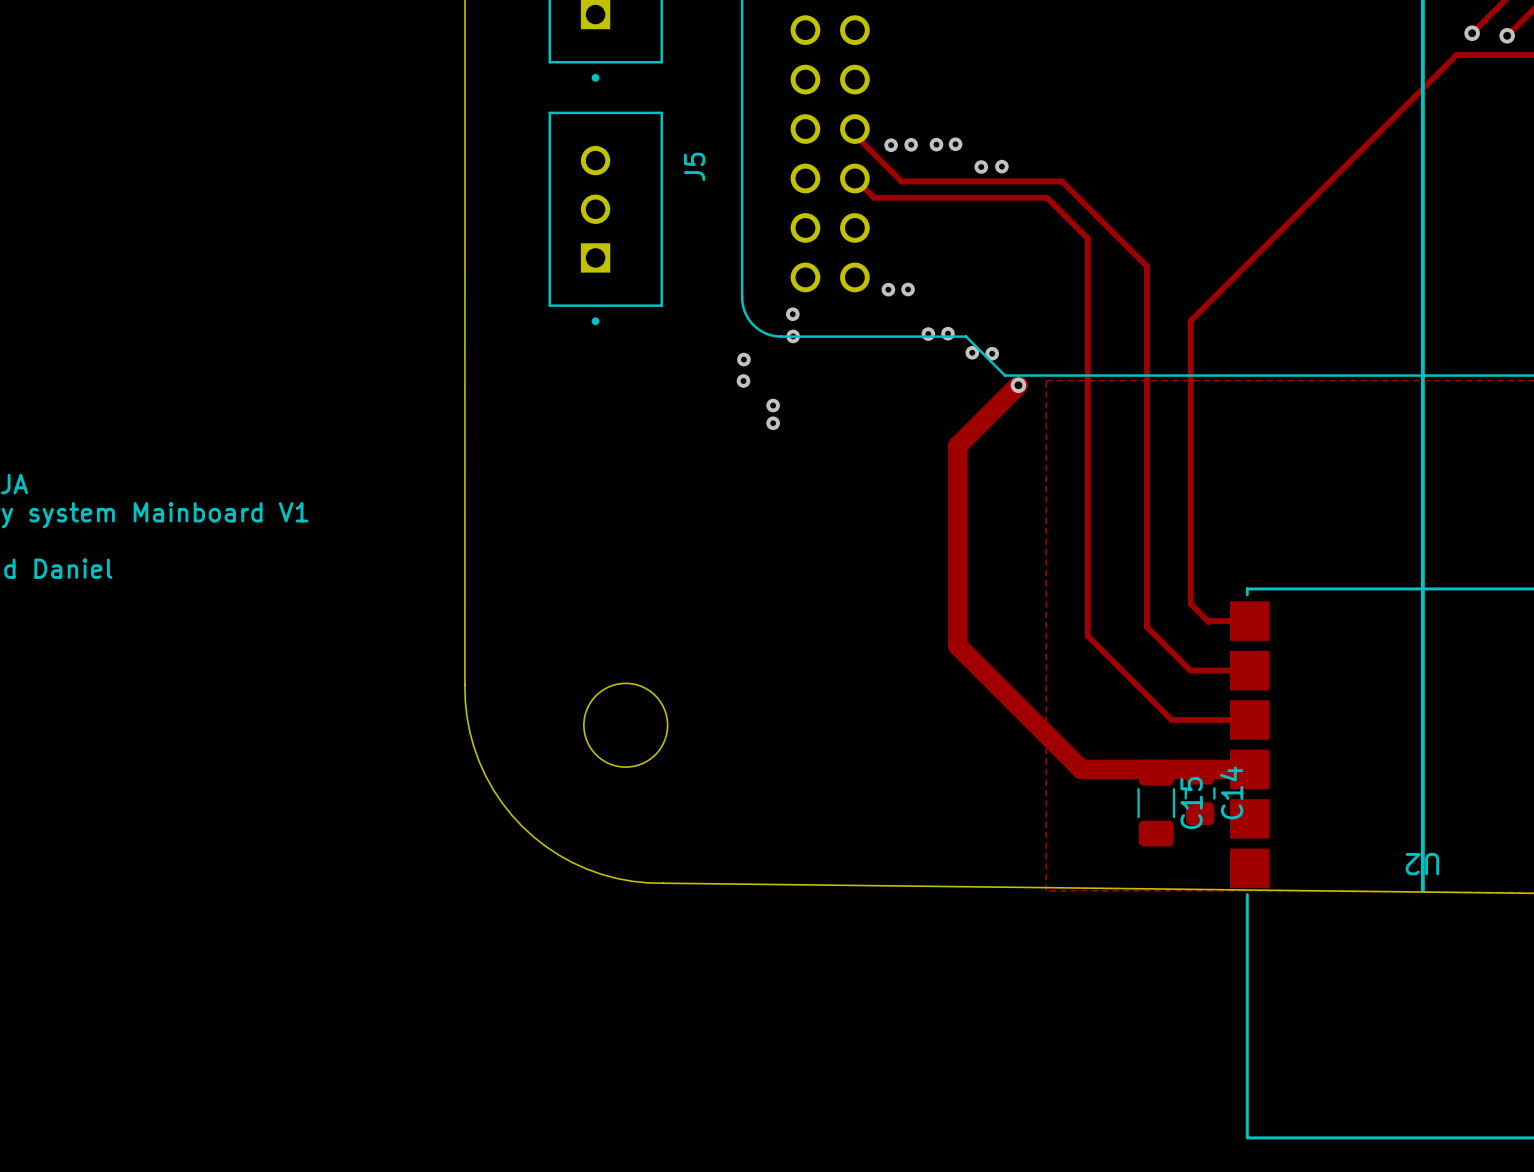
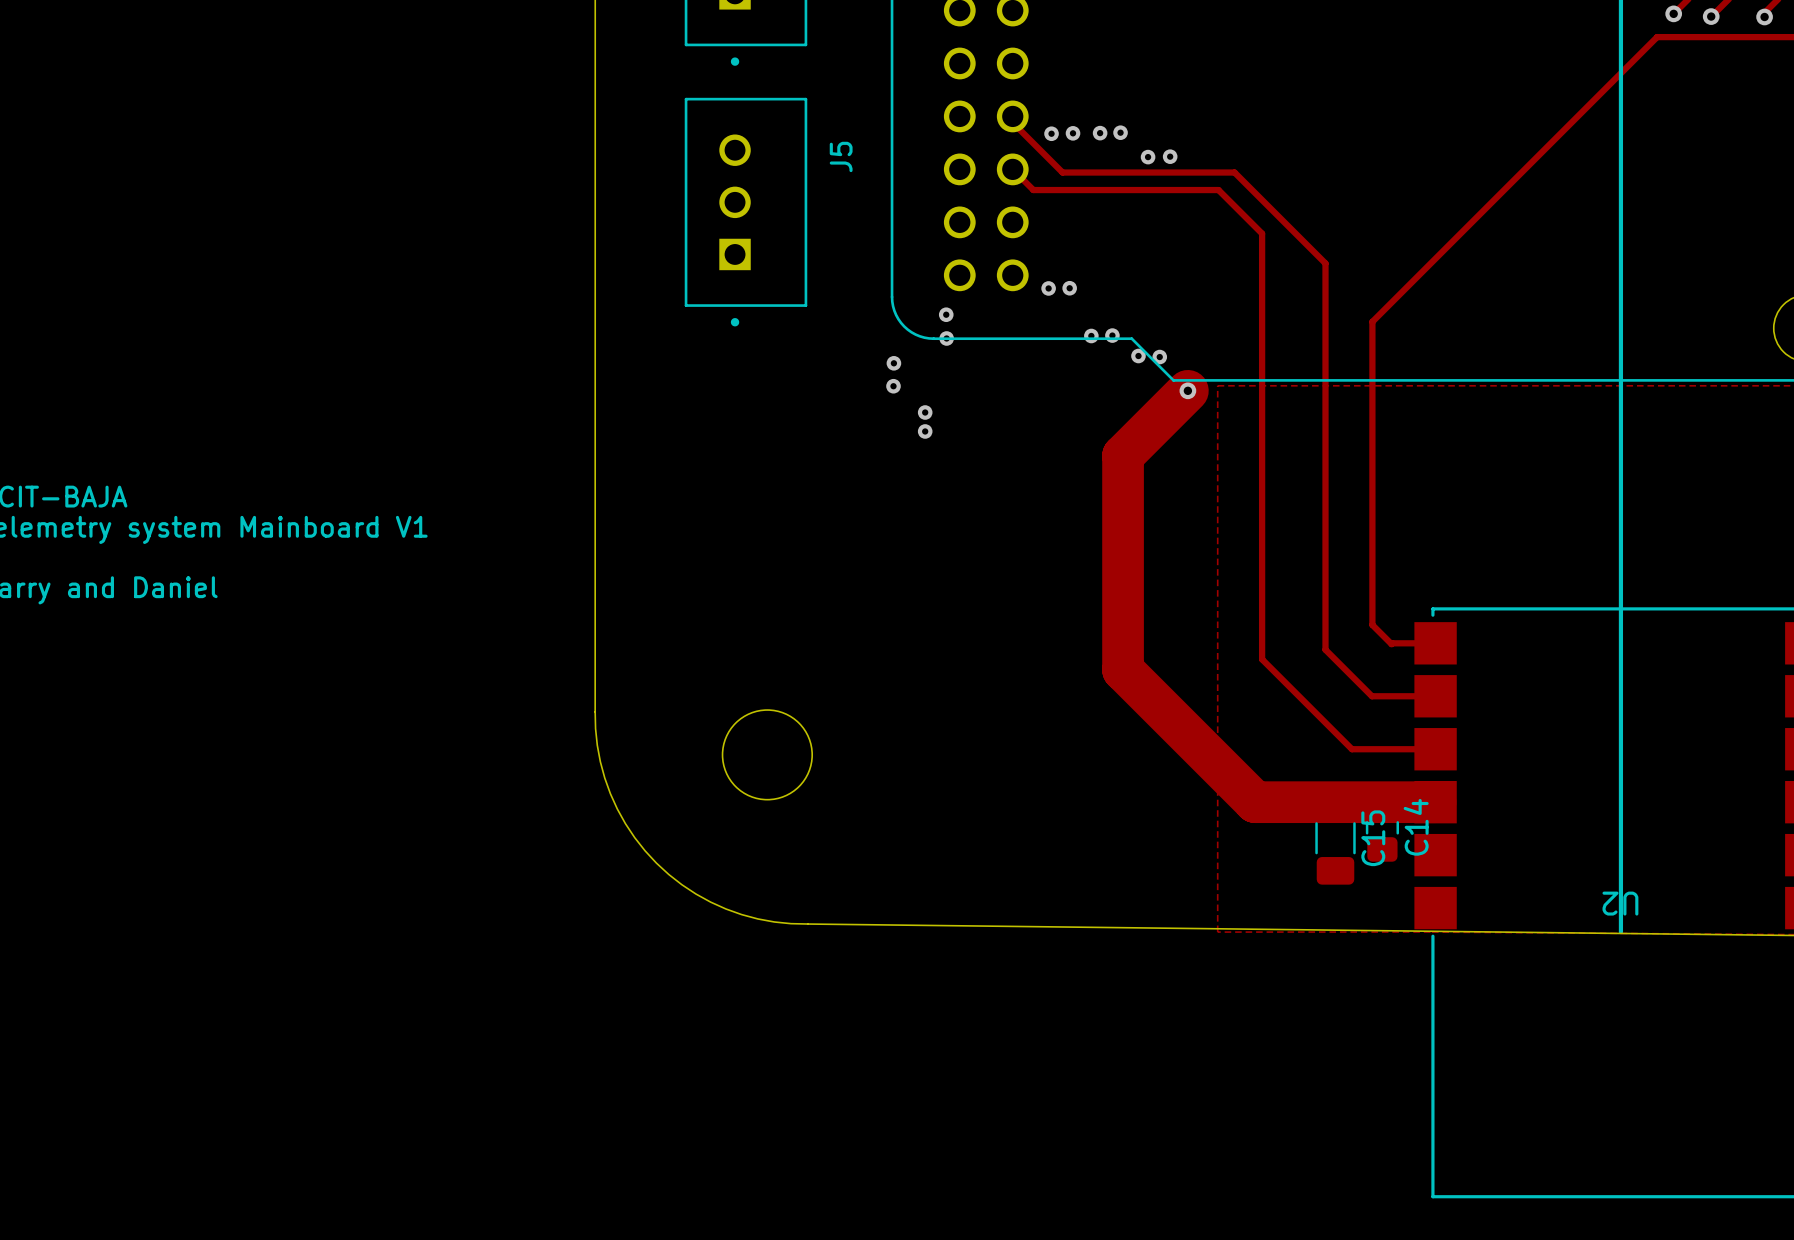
track width: thin (1018, 385) (957, 445) (957, 645) (1081, 769) (1249, 769) -> thick (1187, 390) (1123, 455) (1123, 669) (1255, 802) (1435, 802)

